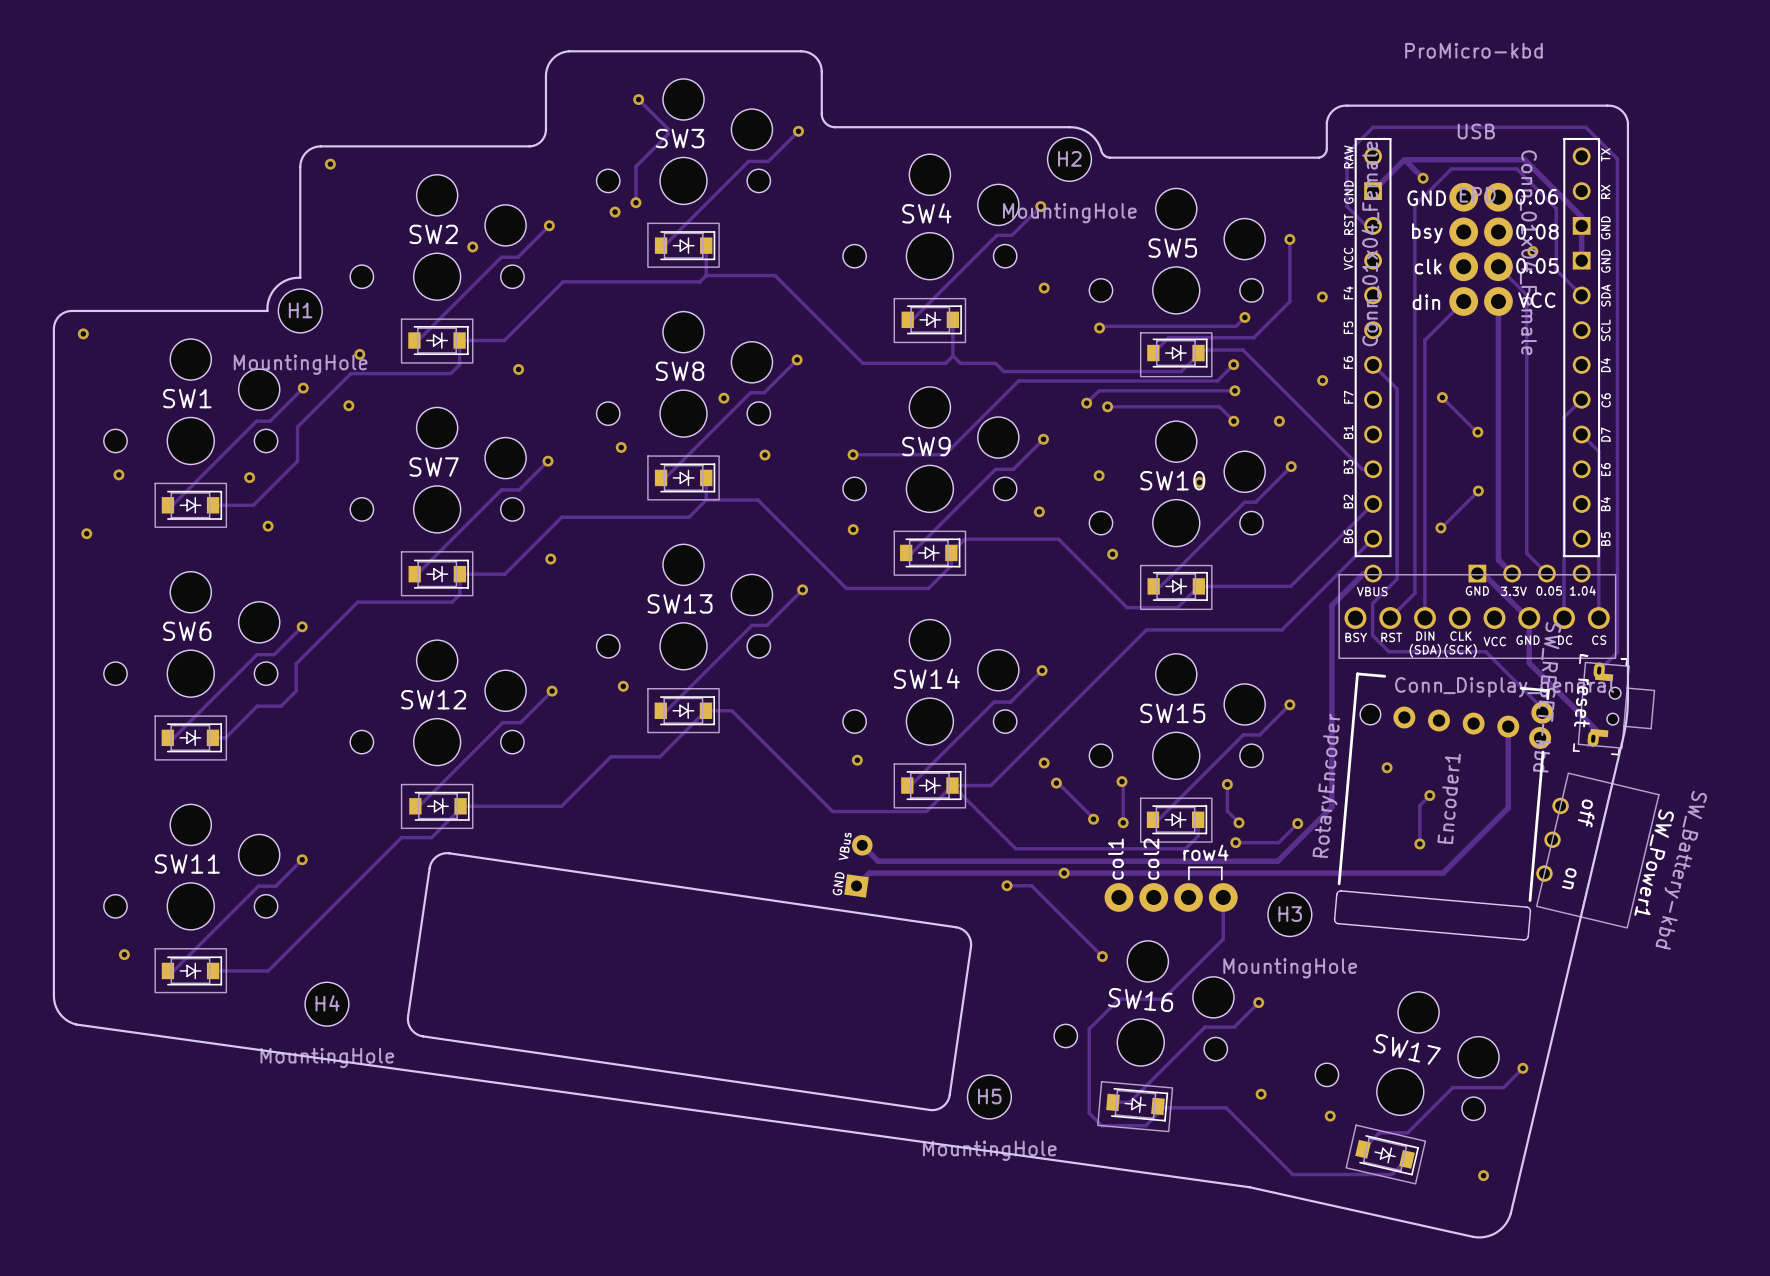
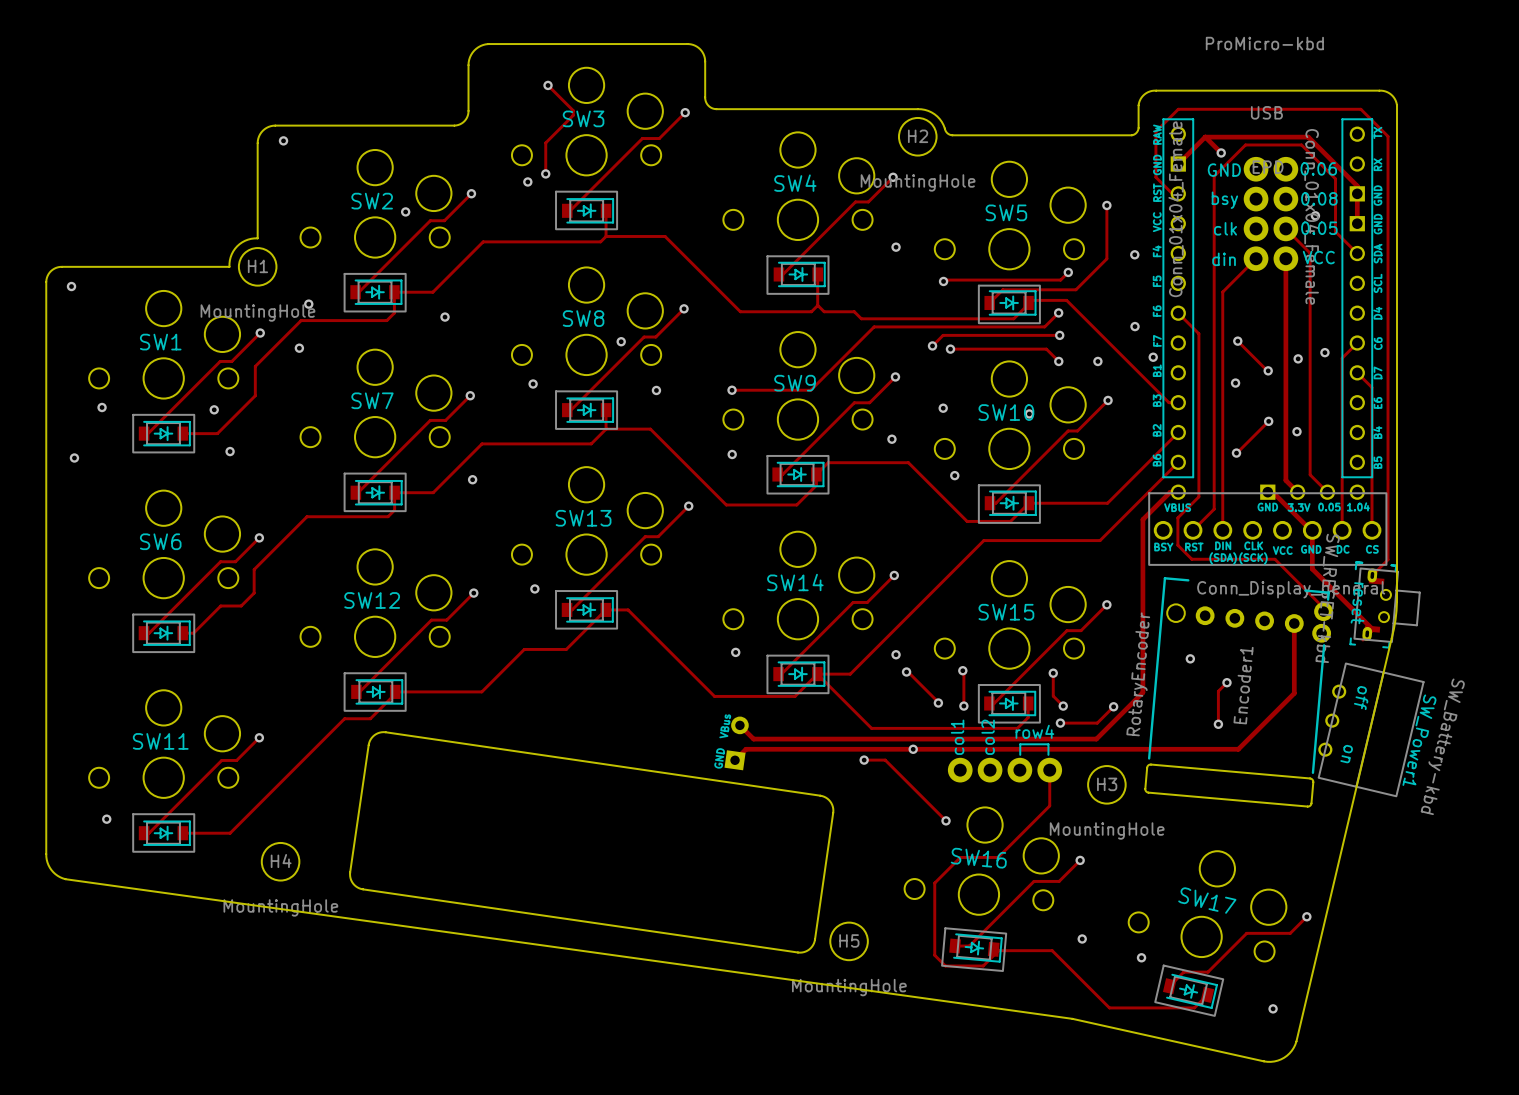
via: none -> (1324, 352)
via: none -> (1153, 357)
via: none -> (1298, 358)
via: none -> (1235, 383)
via: none -> (1296, 431)

